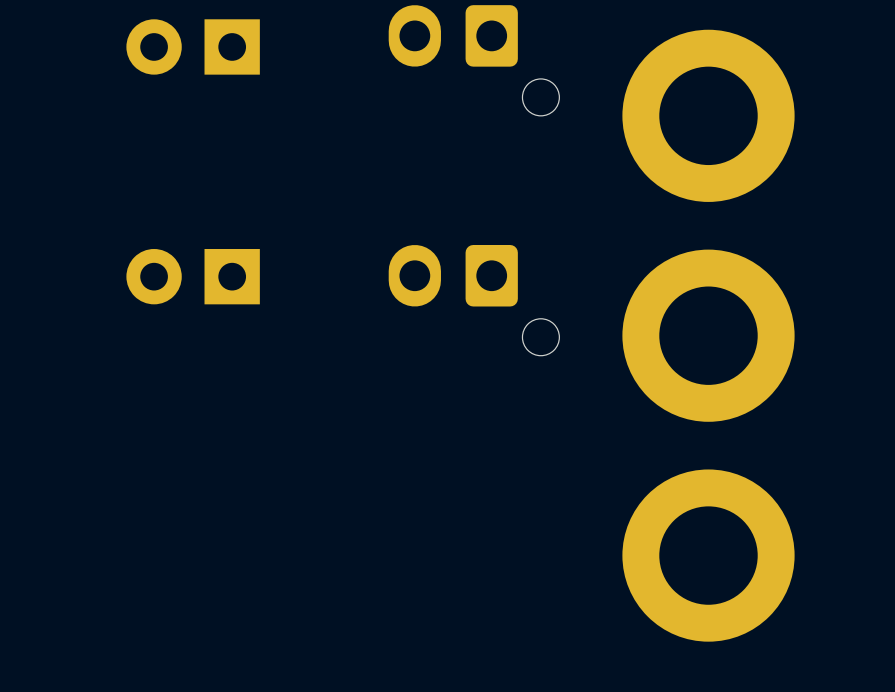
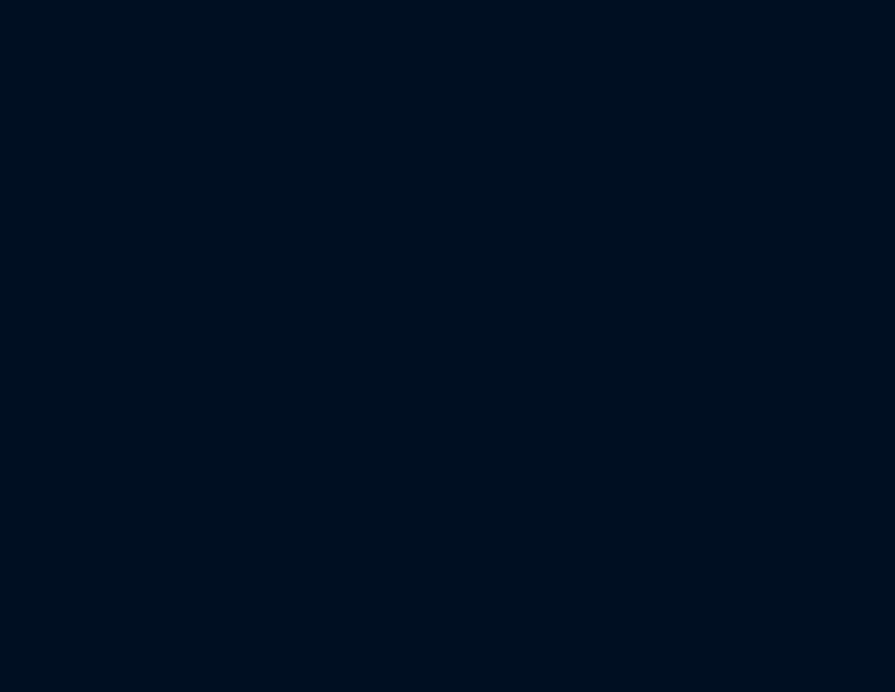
part: (193, 46) -> none
part: (474, 60) -> none
part: (708, 115) -> none
part: (193, 276) -> none
part: (474, 300) -> none
part: (708, 335) -> none
part: (708, 555) -> none

